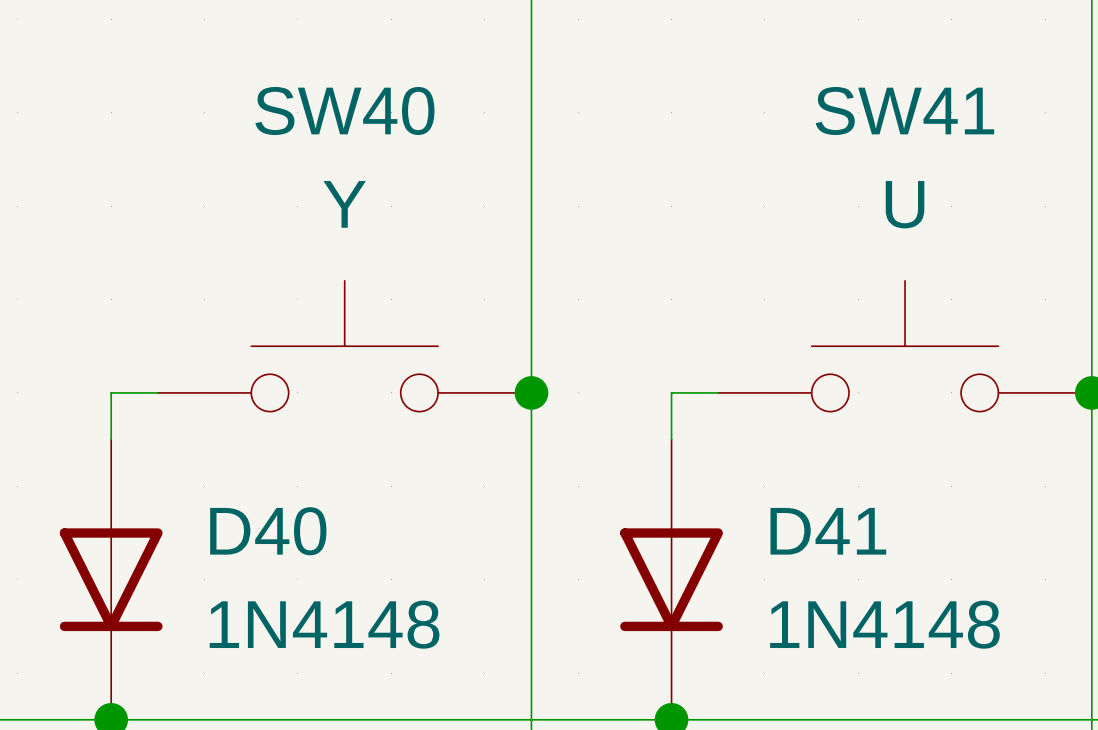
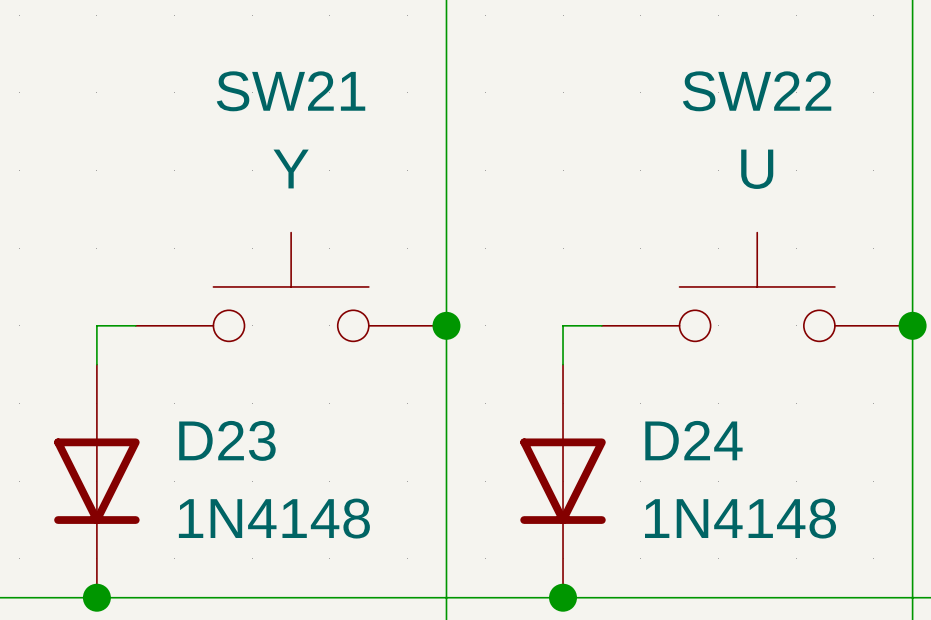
SW40 name: SW40 (344, 110) -> SW21 (291, 91)
SW41 name: SW41 (904, 110) -> SW22 (757, 91)
D40 name: D40 (268, 531) -> D23 (227, 440)
D41 name: D41 (828, 531) -> D24 (693, 440)

